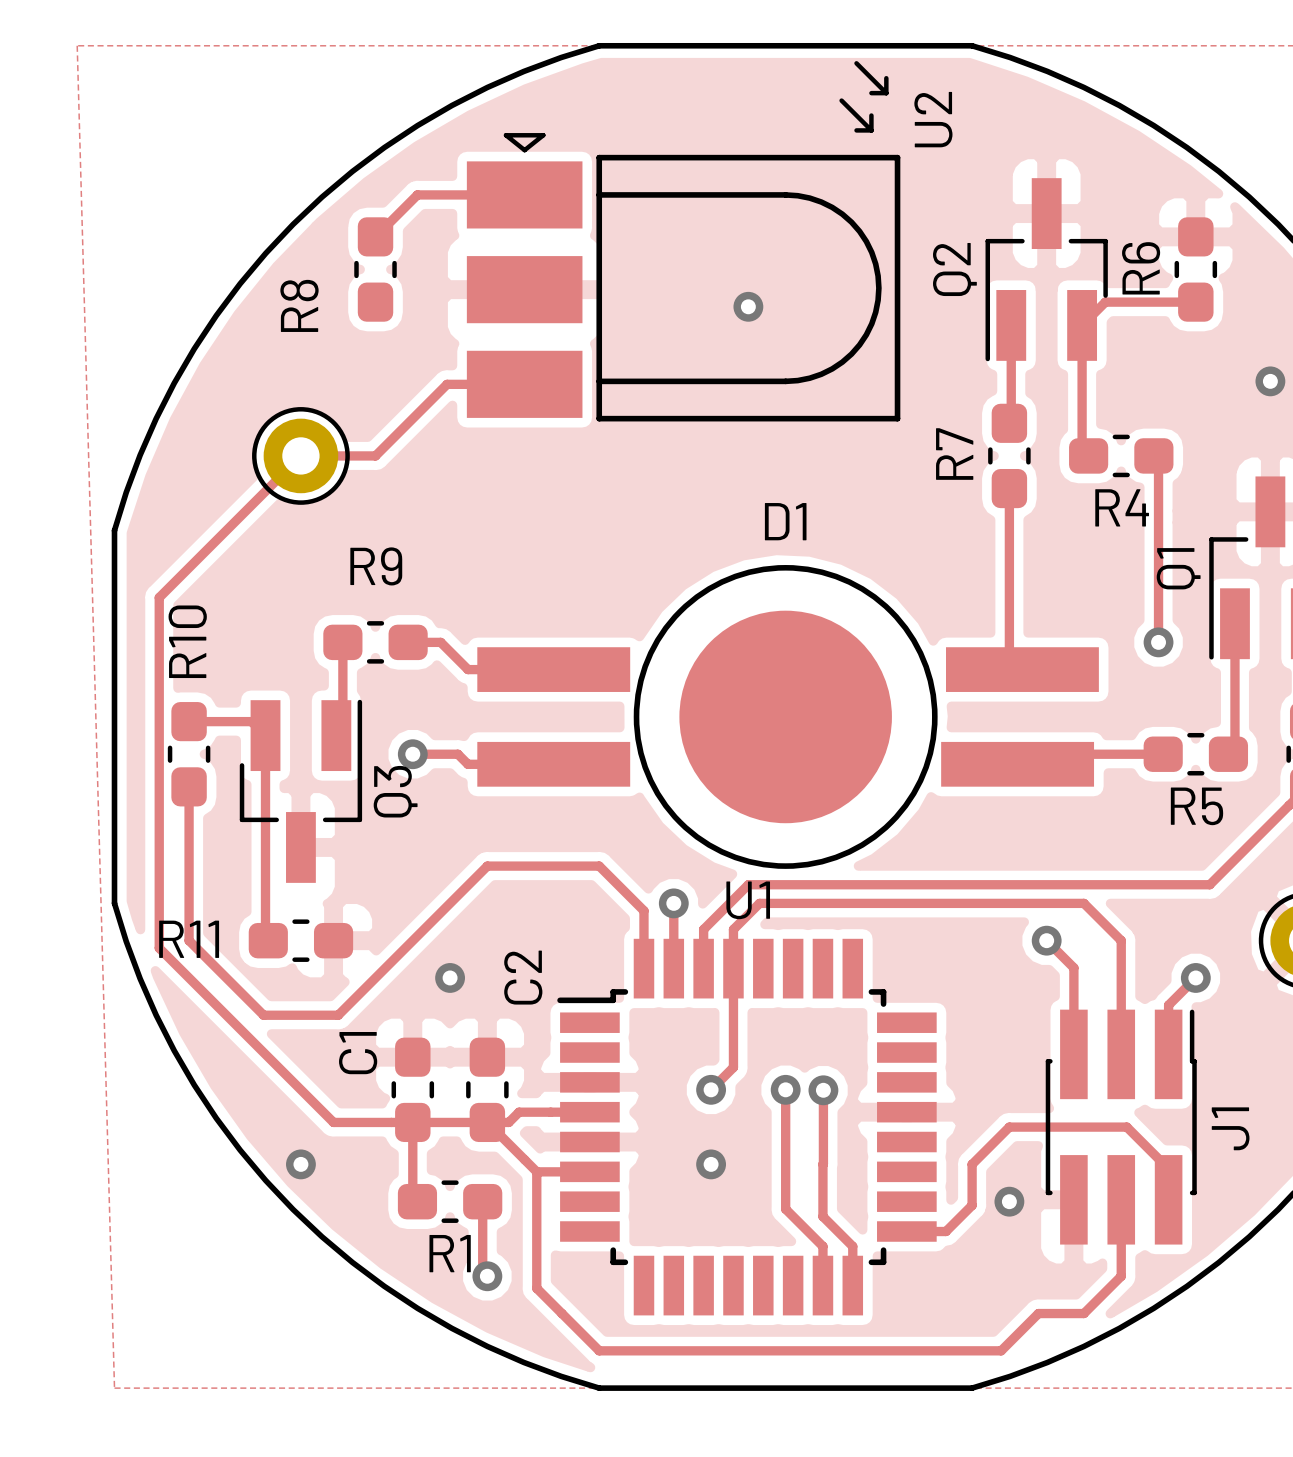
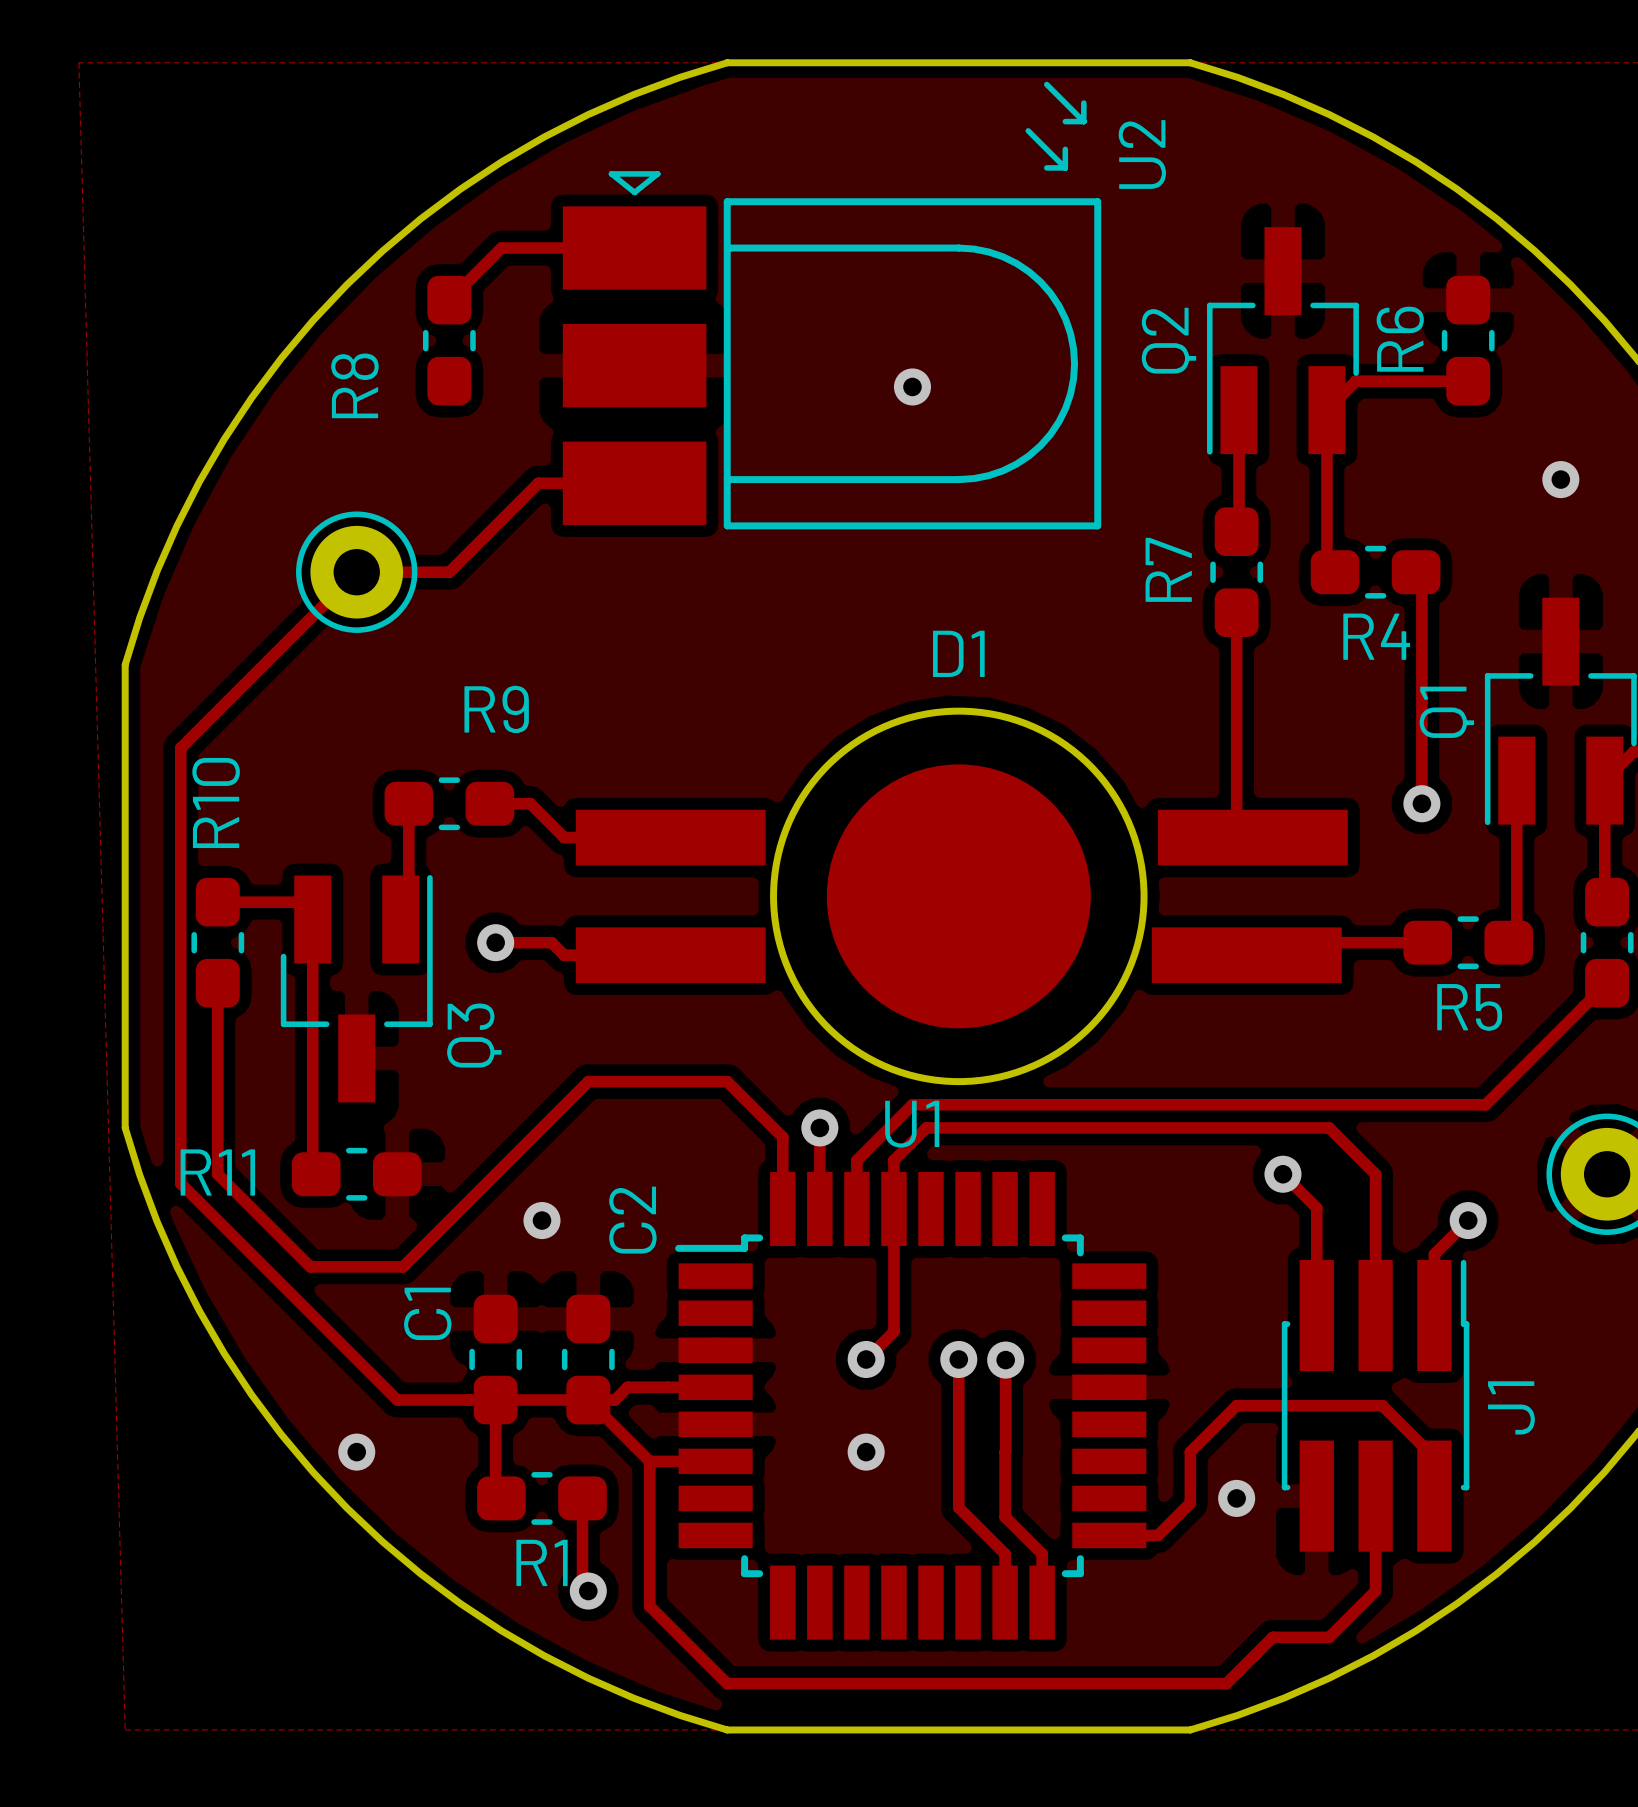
R9 name position: R9 (376, 566) -> R9 (496, 709)
Q3 name position: Q3 (395, 791) -> Q3 (474, 1035)

